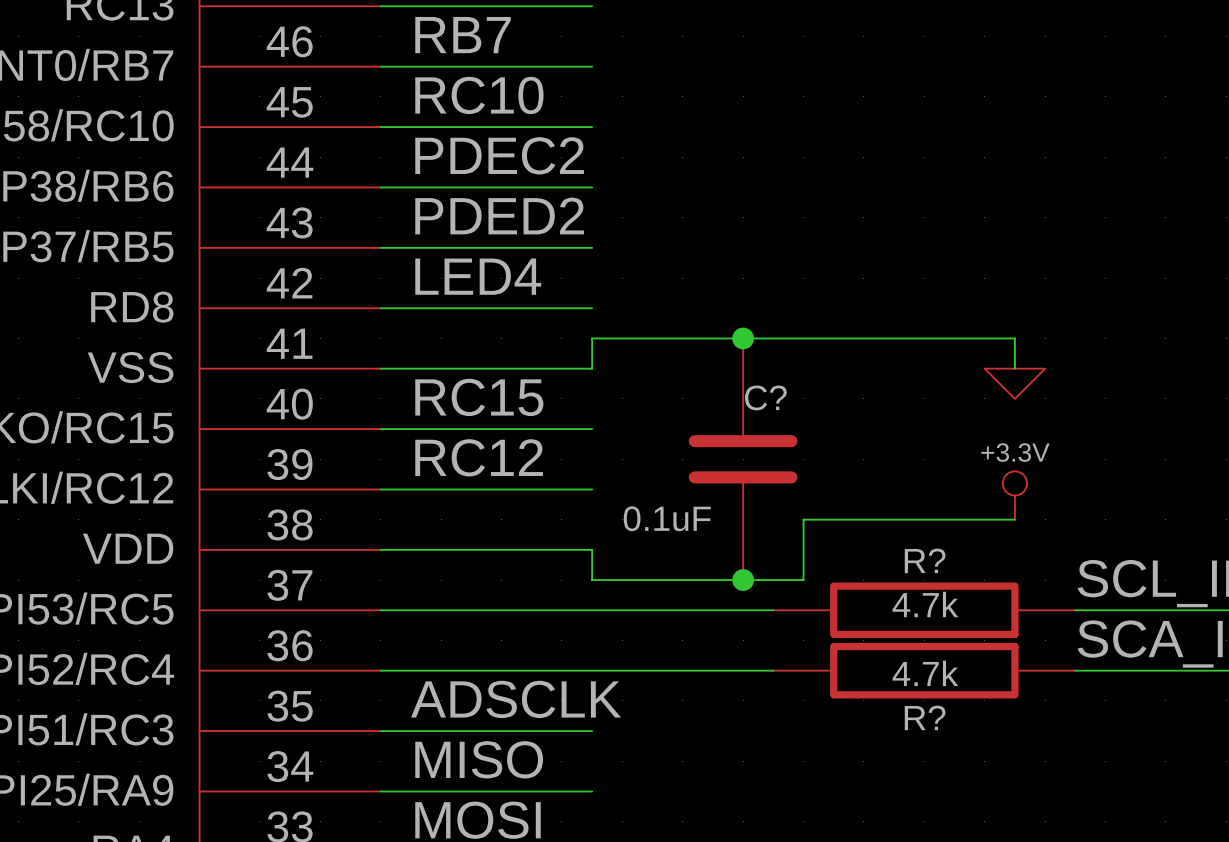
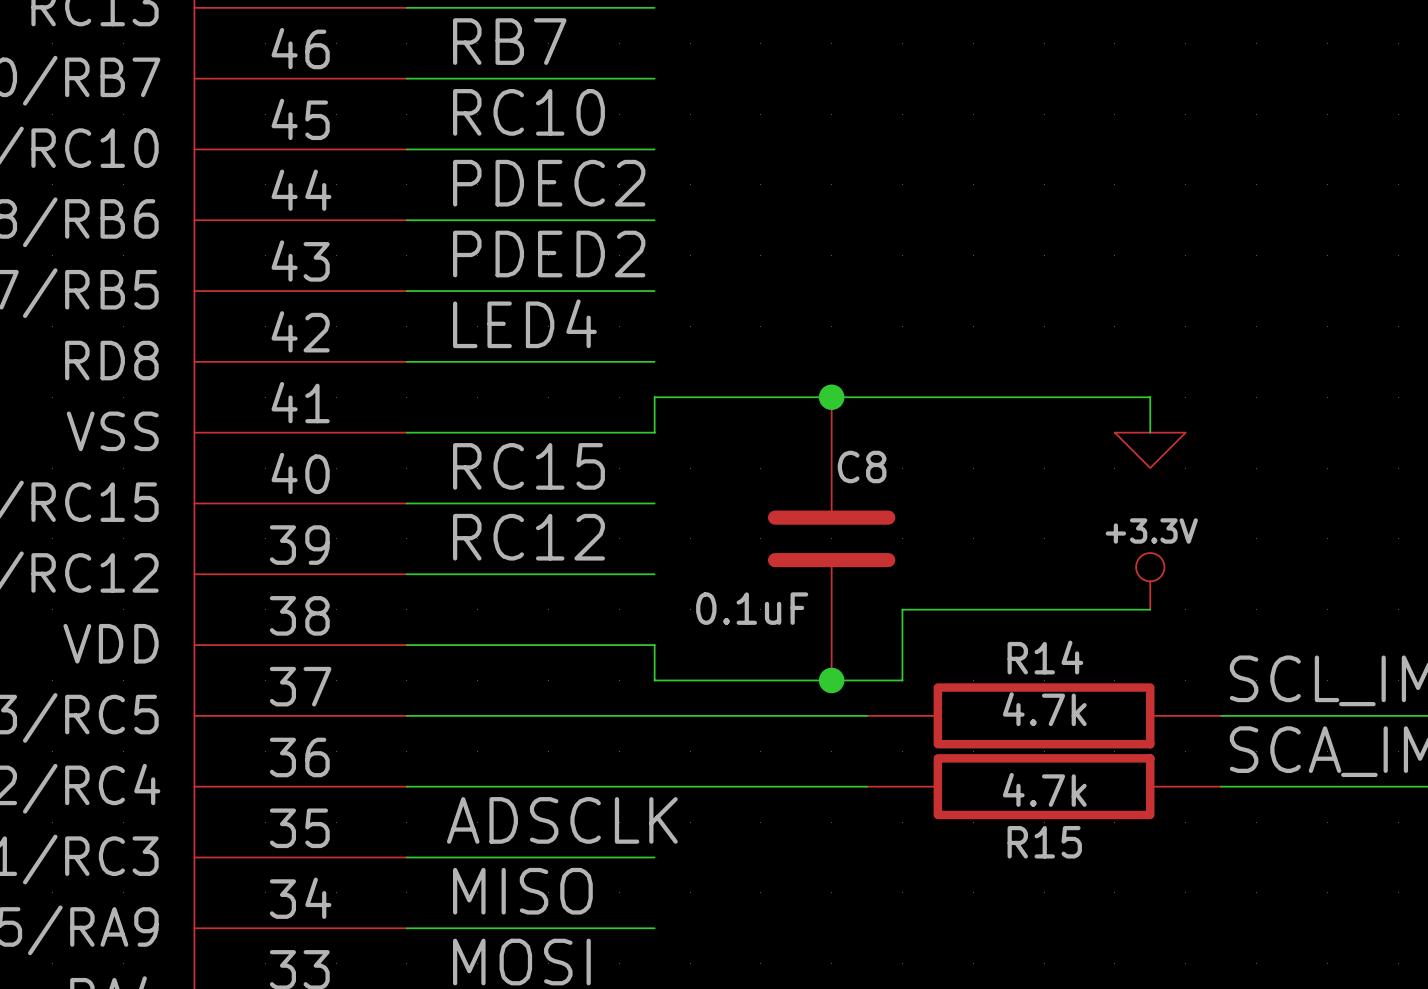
C? name: C? (765, 397) -> C8 (862, 467)
R? name: R? (925, 560) -> R14 (1045, 657)
R? name: R? (925, 717) -> R15 (1044, 842)

